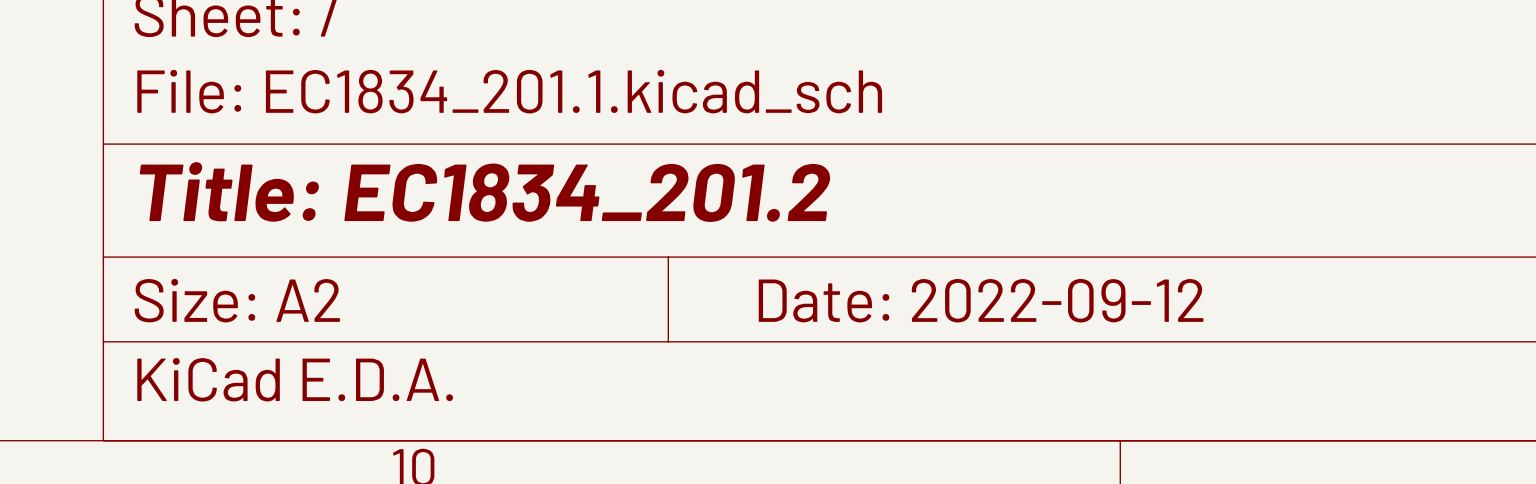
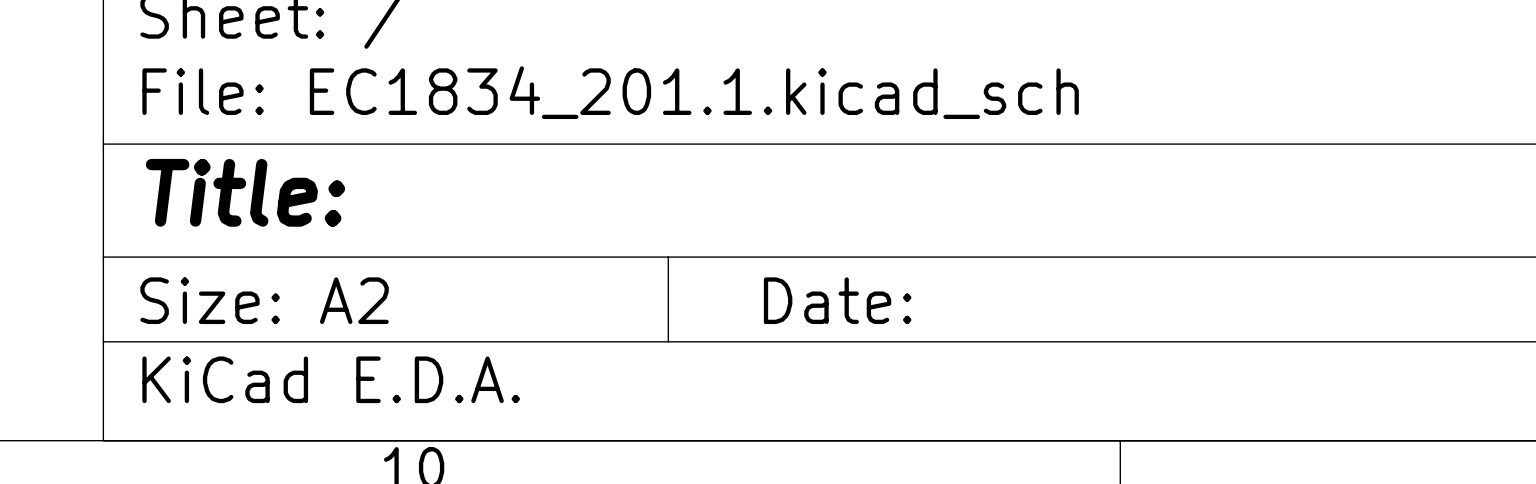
title block: Title: EC1834_201.2 (485, 192) -> Title: (245, 192)
title block: Date: 2022-09-12 (981, 300) -> Date: (837, 300)

